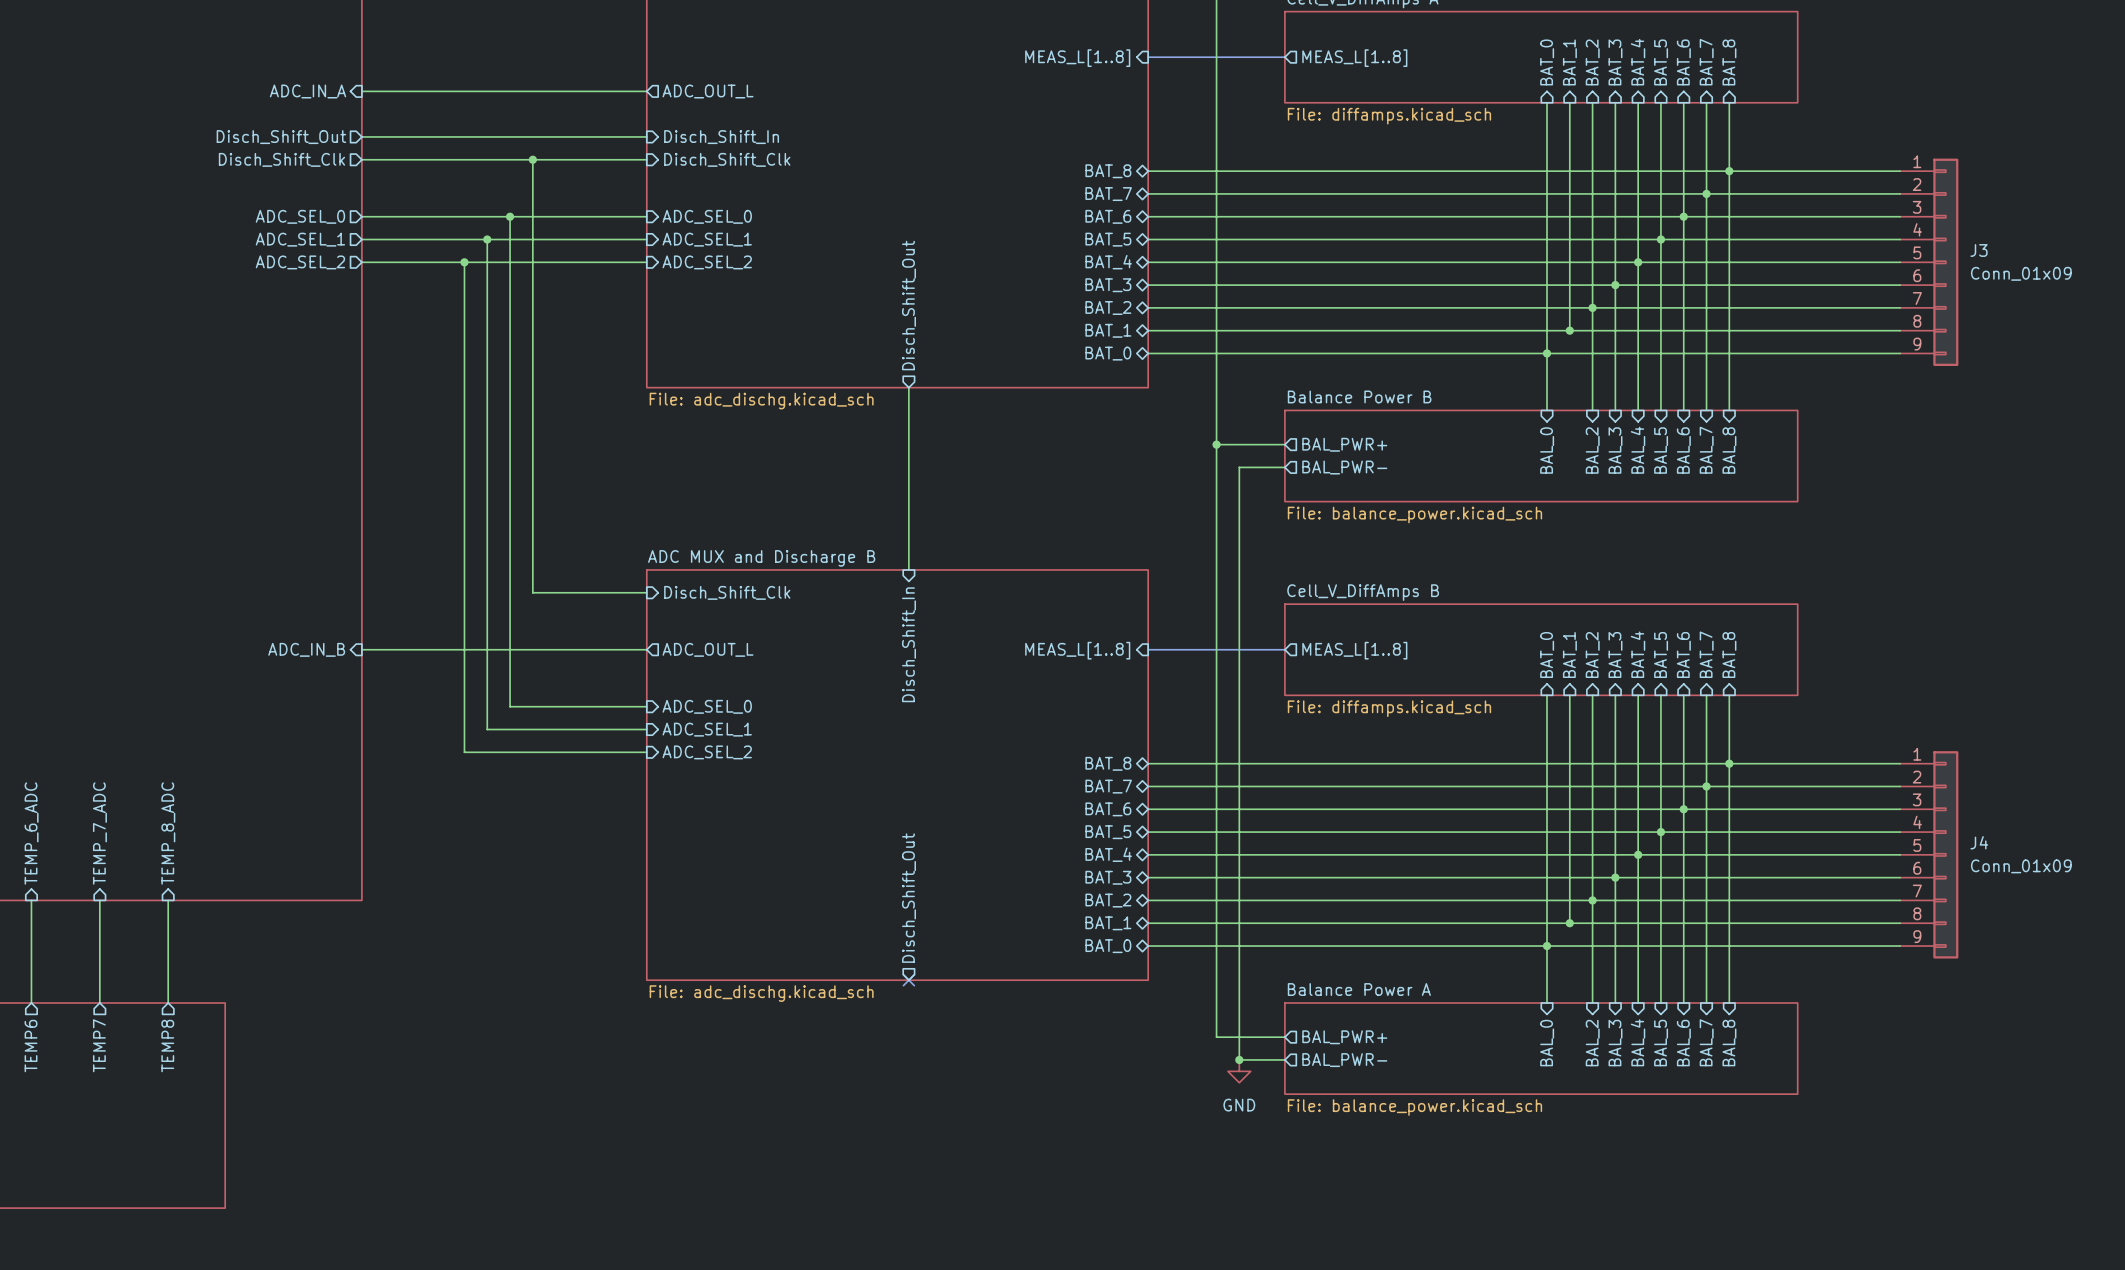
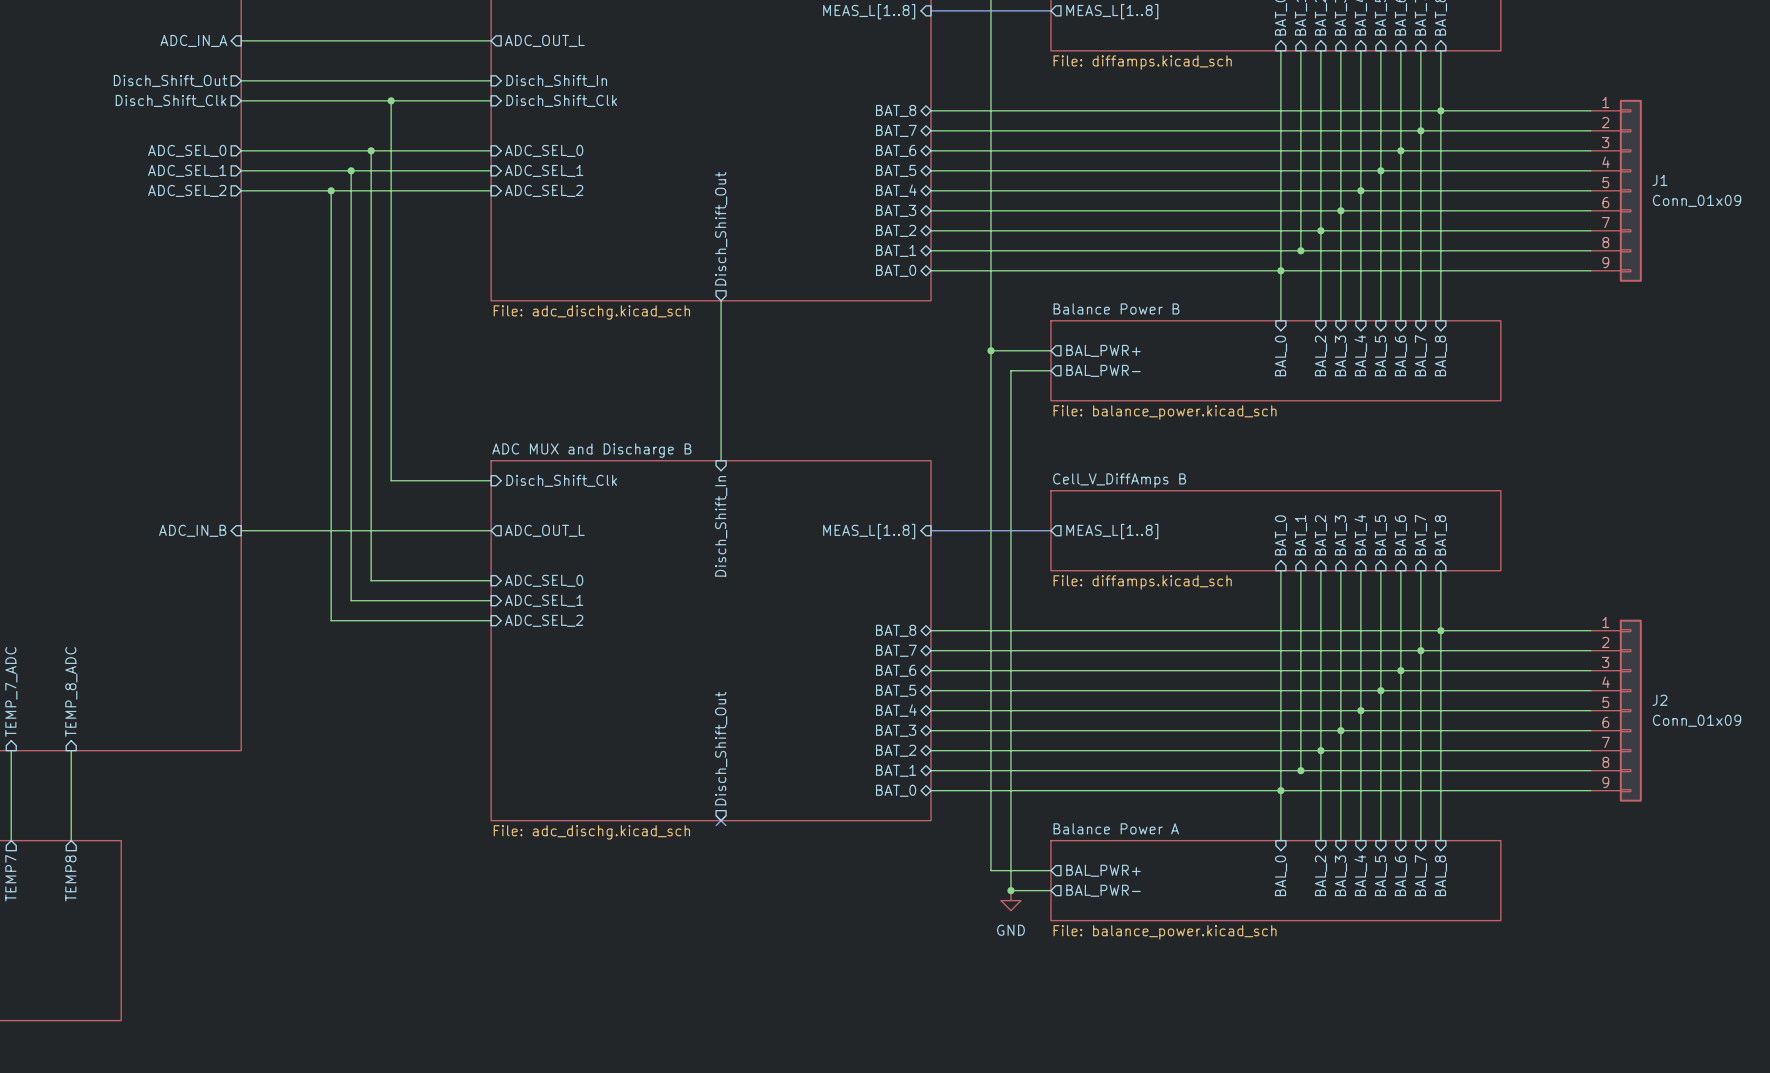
J3 name: J3 (1979, 250) -> J1 (1659, 180)
J4 name: J4 (1979, 842) -> J2 (1659, 700)

